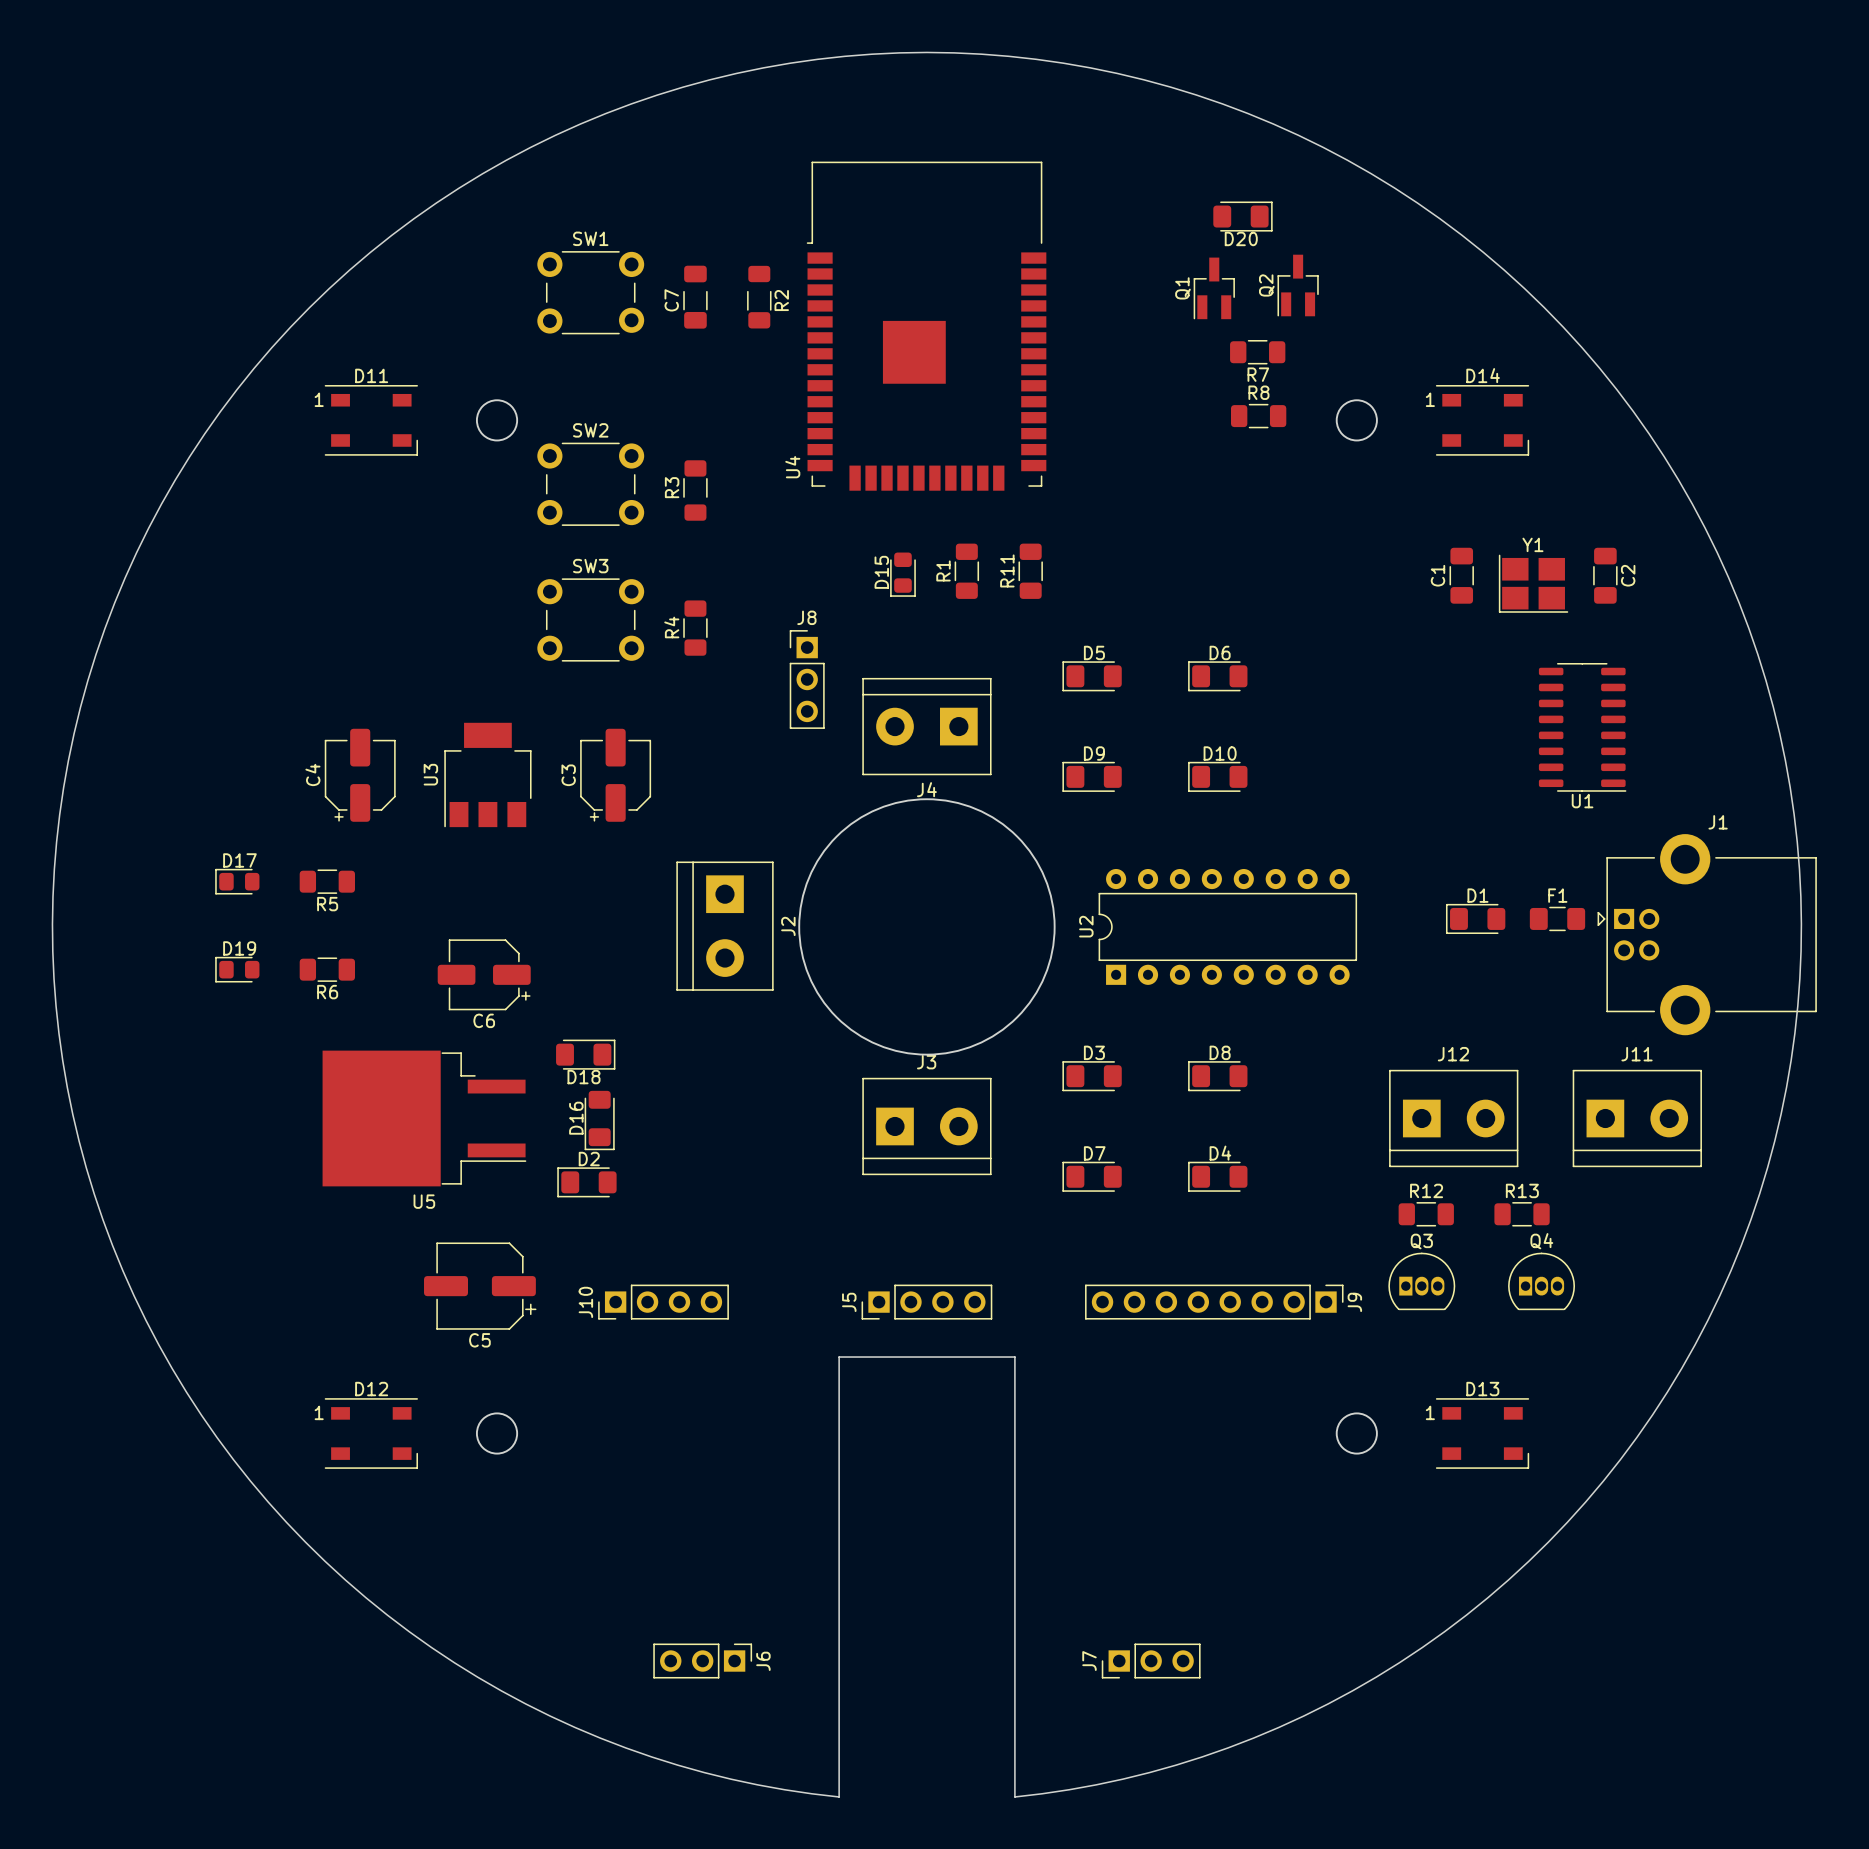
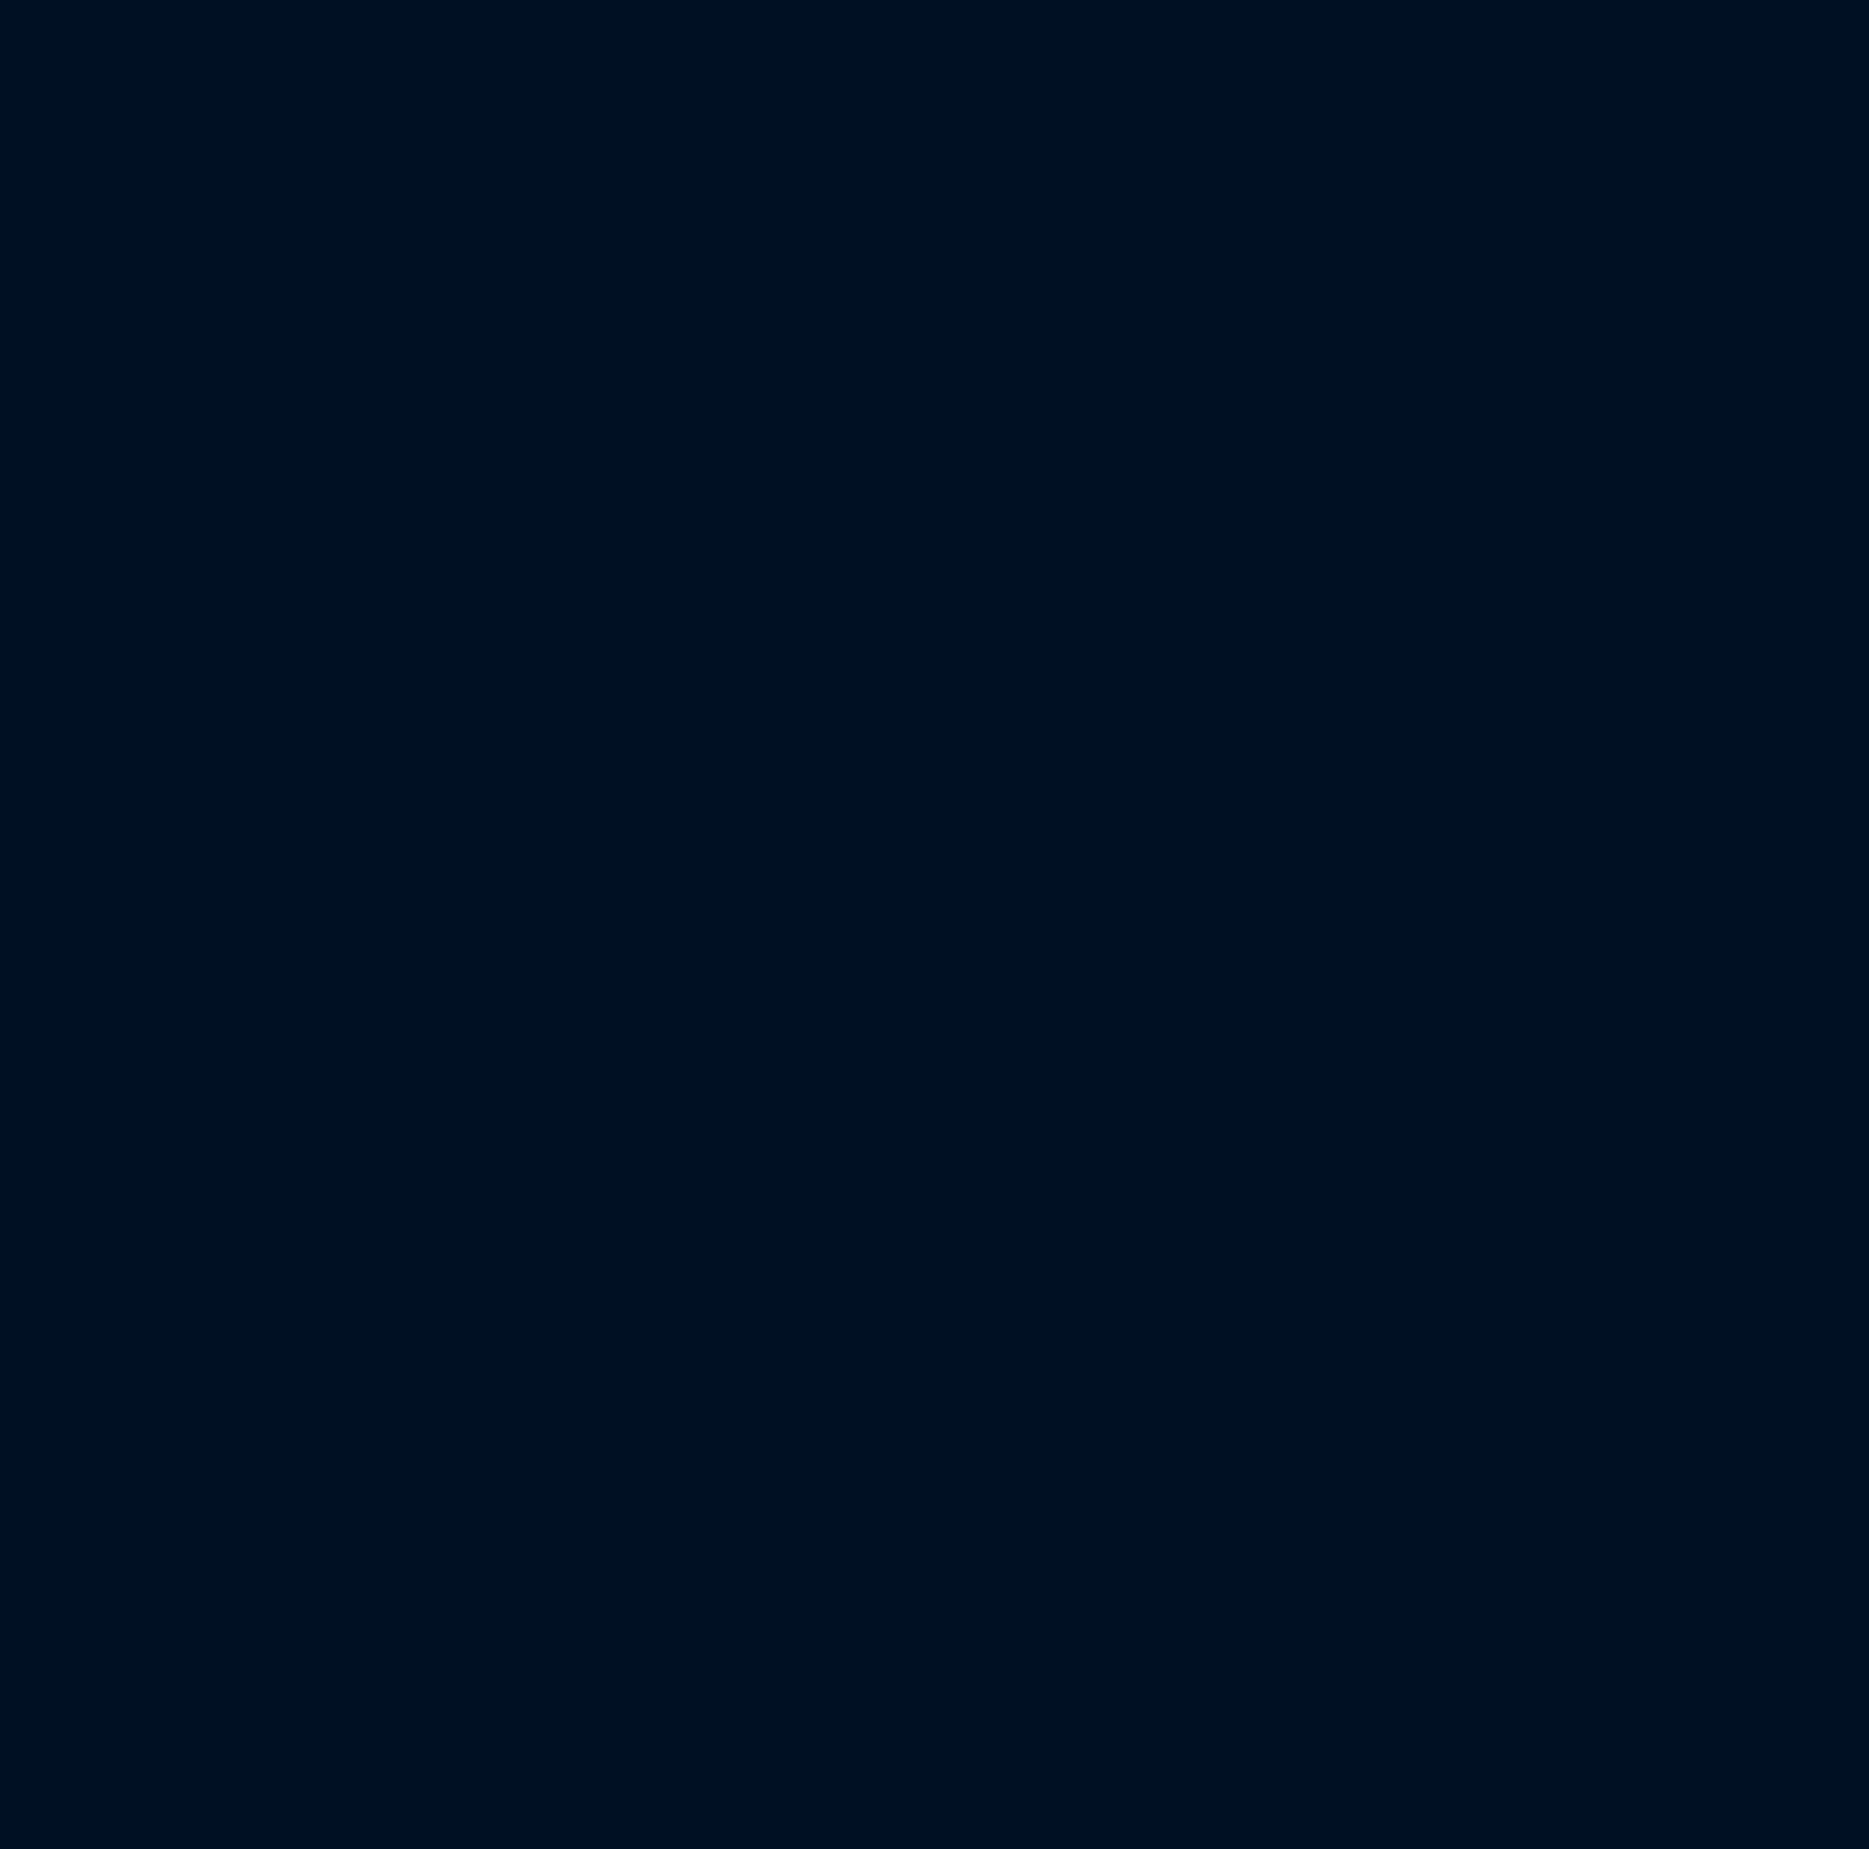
D20: (1242, 216) -> none
Q2: (1298, 285) -> none
Q1: (1214, 288) -> none
SW1: (590, 292) -> none
C7: (695, 297) -> none
R2: (759, 297) -> none
U4: (926, 326) -> none
R7: (1257, 352) -> none
round board edge: [475, 399, 519, 442] -> none
round board edge: [1335, 399, 1378, 442] -> none
R8: (1258, 416) -> none
D11: (371, 420) -> none
D14: (1482, 420) -> none
SW2: (590, 484) -> none
R3: (695, 490) -> none
R1: (966, 571) -> none
R11: (1030, 571) -> none
D15: (902, 574) -> none
C1: (1461, 575) -> none
C2: (1605, 575) -> none
Y1: (1533, 583) -> none
SW3: (590, 619) -> none
R4: (695, 628) -> none
D5: (1092, 676) -> none
D6: (1217, 676) -> none
J8: (807, 679) -> none
J4: (926, 726) -> none
U1: (1582, 727) -> none
C4: (360, 775) -> none
U3: (487, 775) -> none
C3: (615, 775) -> none
D9: (1092, 776) -> none
D10: (1217, 776) -> none
round board edge: [798, 798, 1056, 1056] -> none
D17: (237, 881) -> none
R5: (327, 881) -> none
D1: (1475, 918) -> none
F1: (1557, 918) -> none
J2: (724, 926) -> none
U2: (1227, 926) -> none
J1: (1707, 934) -> none
D19: (237, 969) -> none
R6: (327, 969) -> none
C6: (484, 974) -> none
D18: (585, 1054) -> none
D3: (1092, 1076) -> none
D8: (1217, 1076) -> none
U5: (424, 1118) -> none
J12: (1453, 1118) -> none
J11: (1637, 1118) -> none
D16: (599, 1120) -> none
J3: (926, 1126) -> none
D7: (1092, 1176) -> none
D4: (1217, 1176) -> none
D2: (586, 1182) -> none
R12: (1426, 1214) -> none
R13: (1522, 1214) -> none
Q3: (1421, 1281) -> none
Q4: (1541, 1281) -> none
C5: (480, 1286) -> none
J10: (663, 1302) -> none
J5: (926, 1302) -> none
J9: (1214, 1302) -> none
round board edge: [475, 1412, 519, 1455] -> none
round board edge: [1335, 1412, 1378, 1455] -> none
D12: (371, 1433) -> none
D13: (1482, 1433) -> none
J6: (702, 1661) -> none
J7: (1151, 1661) -> none
board edge: (839, 1796) (839, 1357) (1014, 1357) (1014, 1796) (1069, 1789) (1123, 1779) (1176, 1765) (1228, 1747) (1278, 1727) (1328, 1703) (1399, 1662) (1444, 1631) (1487, 1597) (1528, 1561) (1585, 1501) (1620, 1459) (1652, 1415) (1681, 1368) (1707, 1320) (1741, 1245) (1759, 1193) (1774, 1141) (1786, 1087) (1797, 1006) (1801, 923) (1797, 841) (1790, 787) (1779, 733) (1757, 654) (1728, 577) (1692, 503) (1649, 433) (1599, 368) (1544, 307) (1483, 252) (1417, 203) (1347, 160) (1273, 124) (1196, 95) (1143, 79) (1090, 67) (1008, 56) (926, 52) (844, 56) (763, 67) (683, 87) (605, 113) (555, 135) (506, 160) (436, 203) (370, 252) (309, 307) (254, 368) (204, 434) (161, 504) (125, 577) (95, 654) (80, 707) (68, 760) (56, 842) (52, 924) (56, 1006) (67, 1087) (86, 1167) (112, 1245) (146, 1320) (186, 1392) (217, 1437) (250, 1481) (305, 1542) (366, 1597) (431, 1647) (501, 1690) (550, 1716) (600, 1738) (677, 1765) (757, 1784) (839, 1796) -> none

